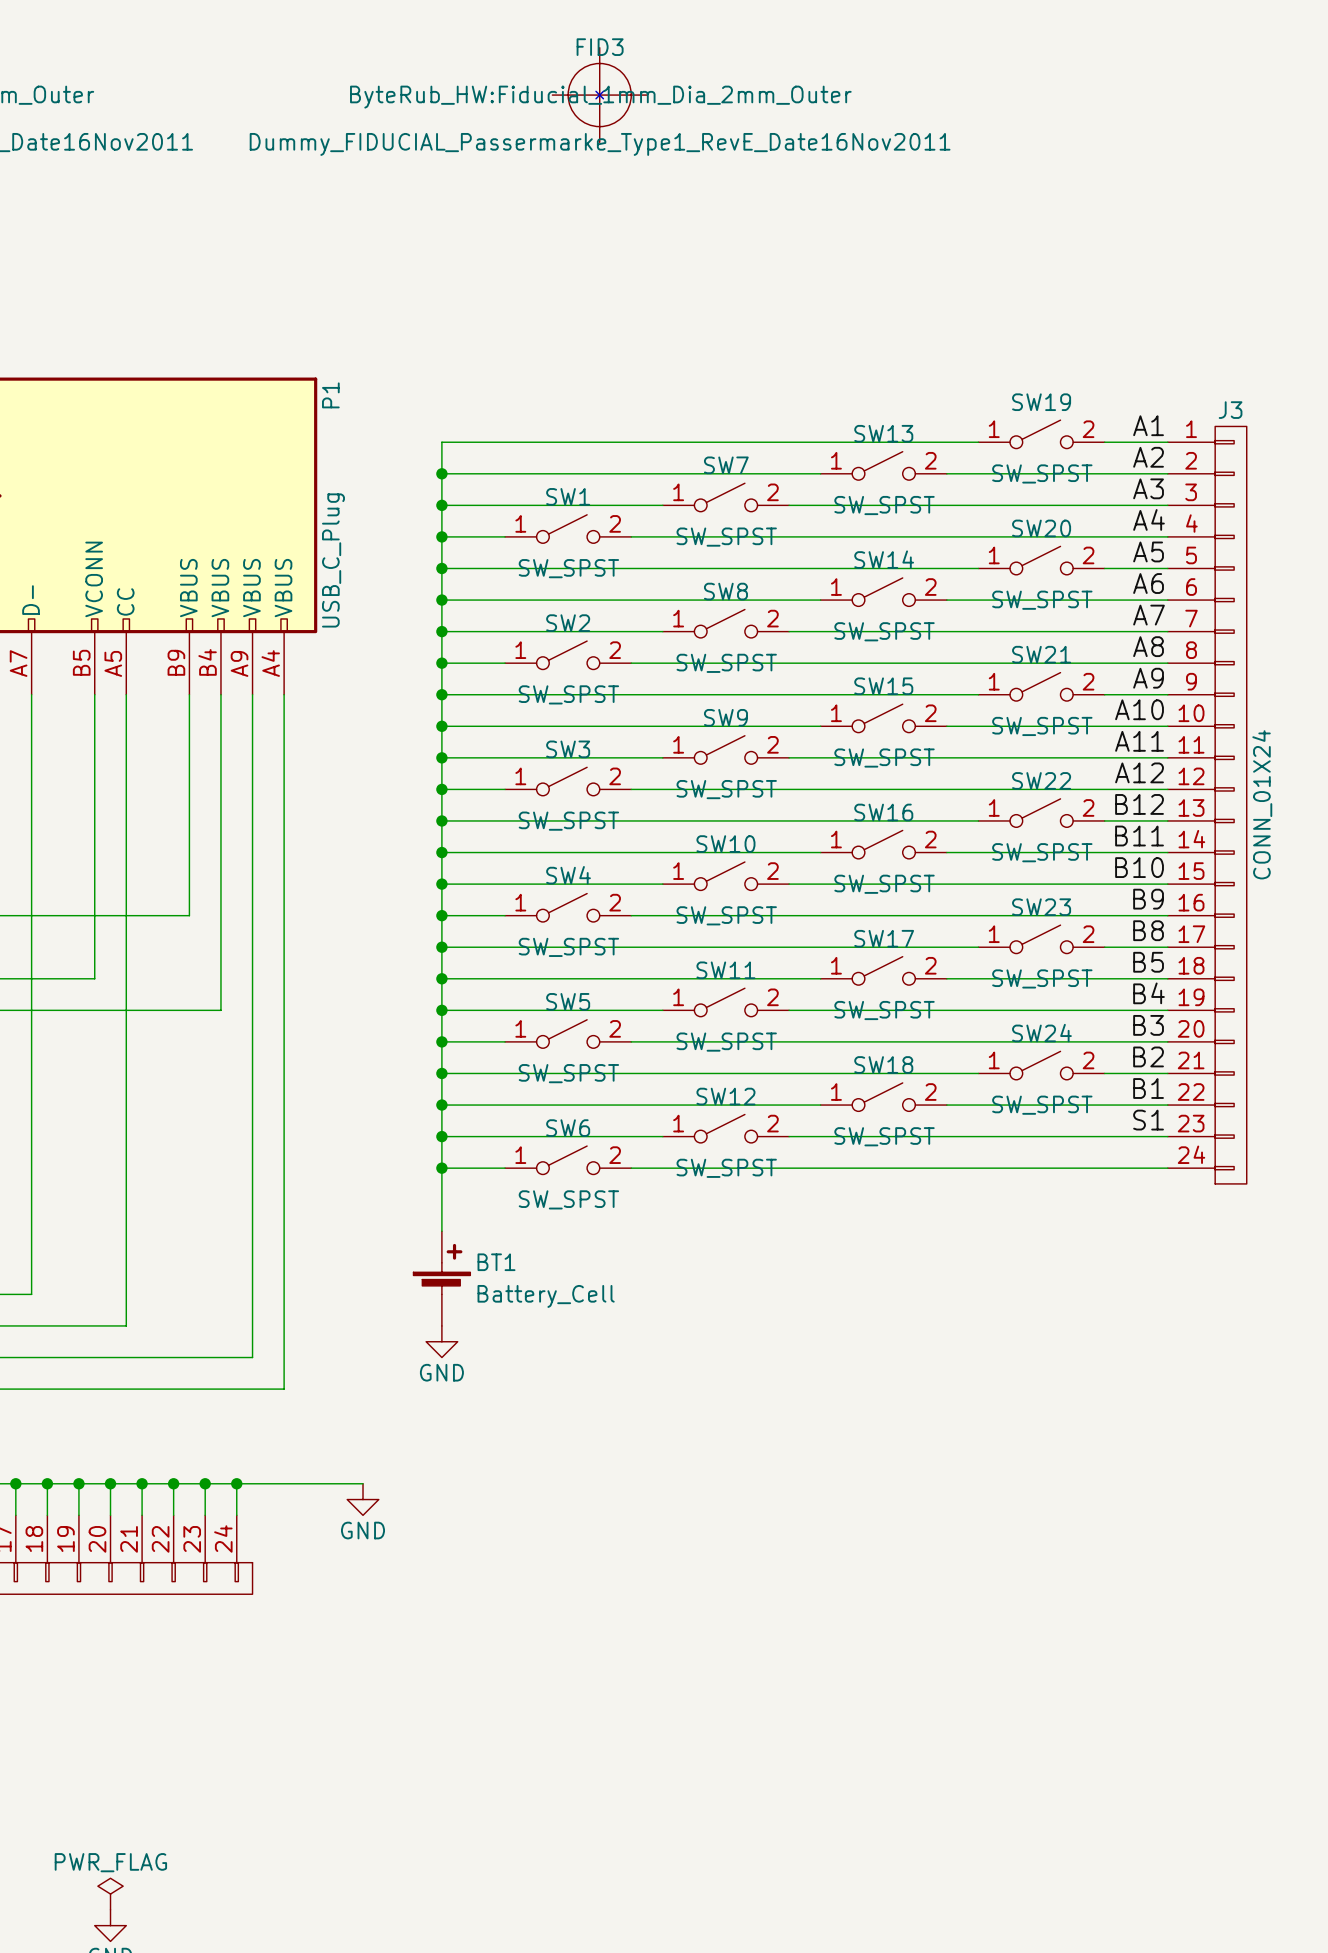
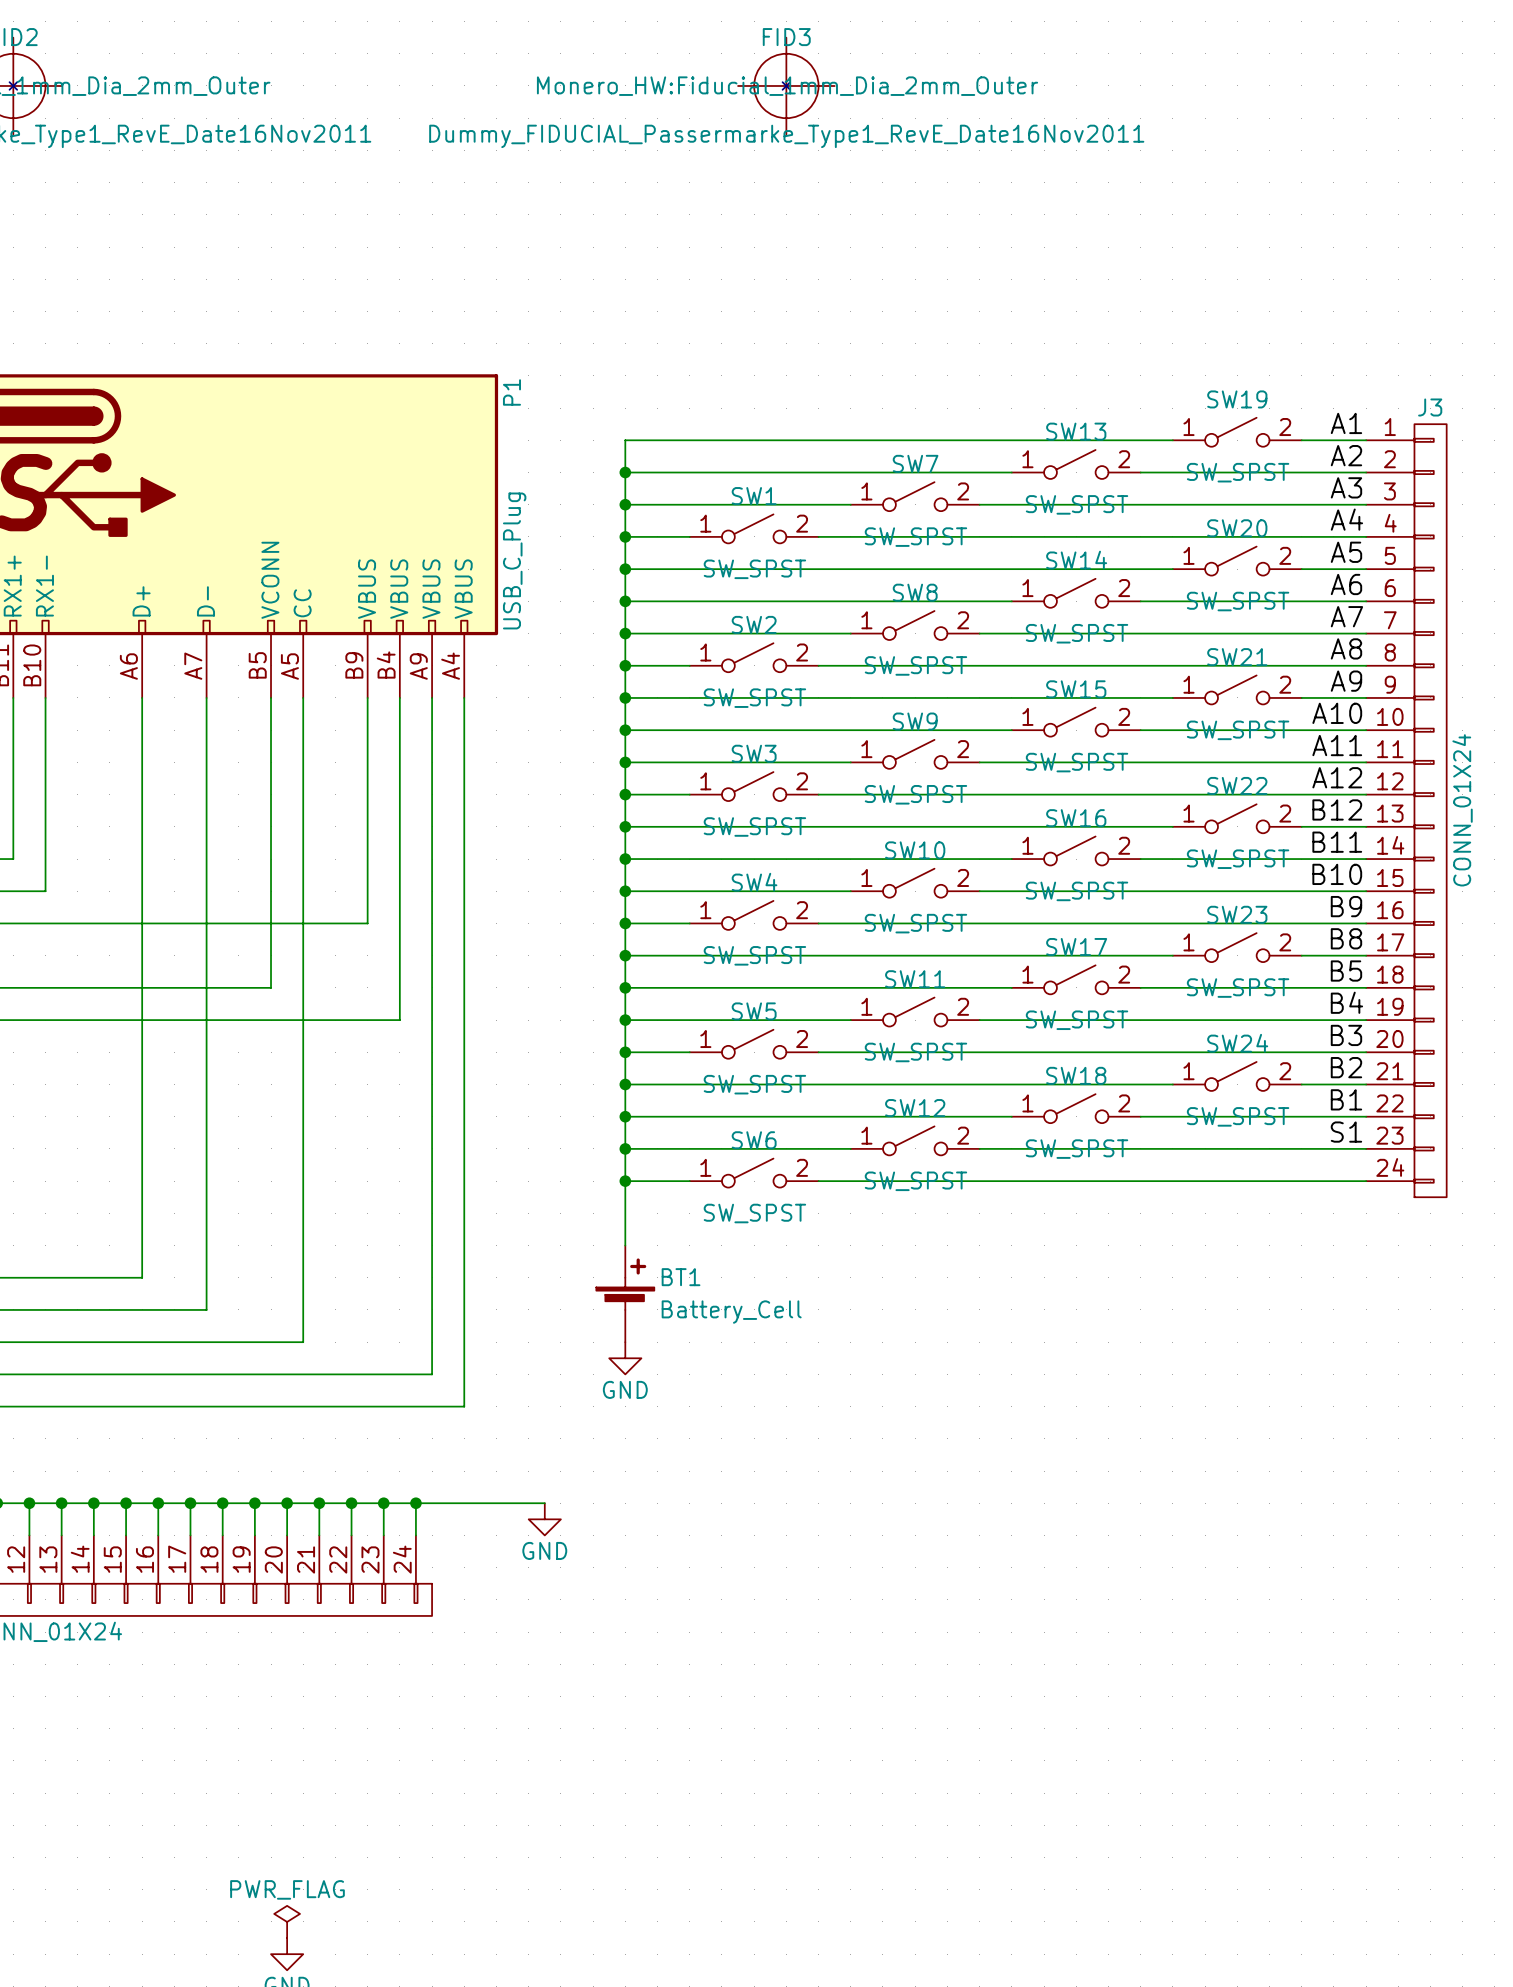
FID3 text: ByteRub_HW:Fiducial_1mm_Dia_2mm_Outer (600, 97) -> Monero_HW:Fiducial_1mm_Dia_2mm_Outer (787, 86)

